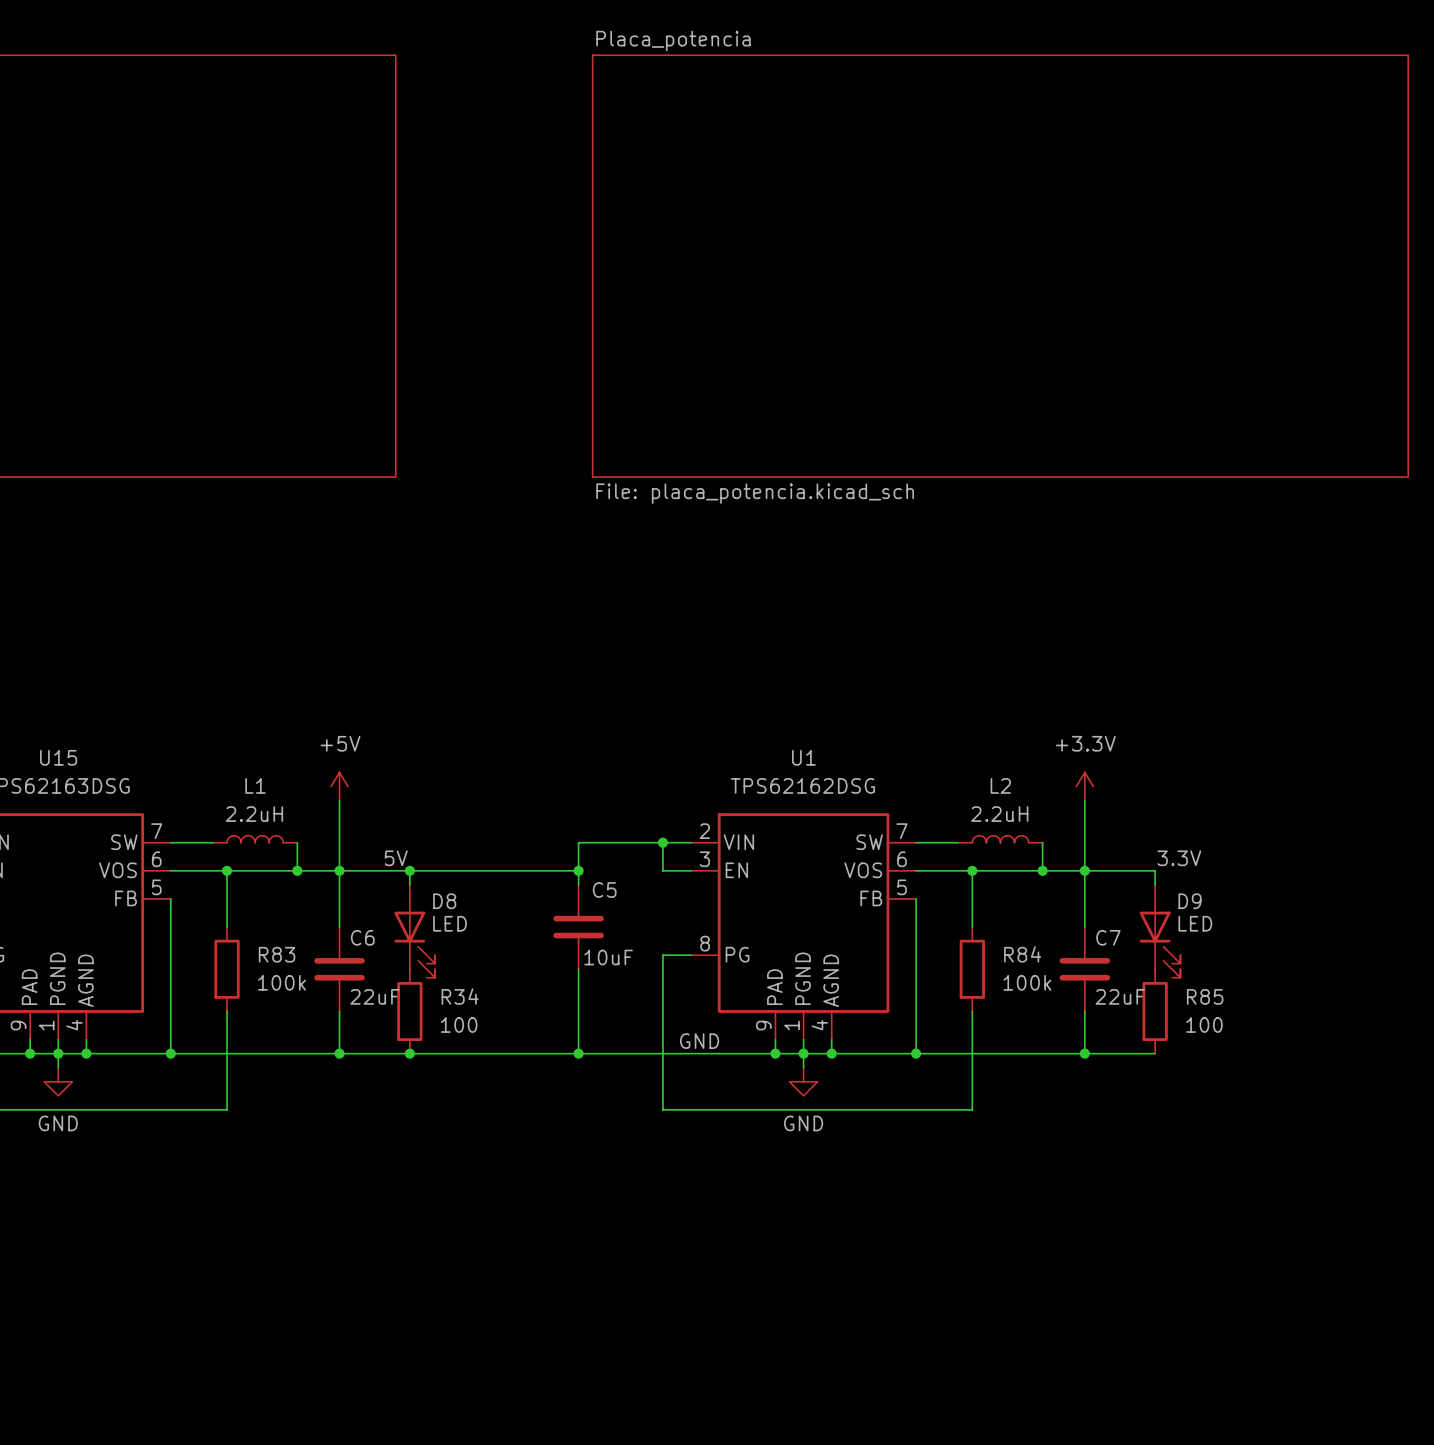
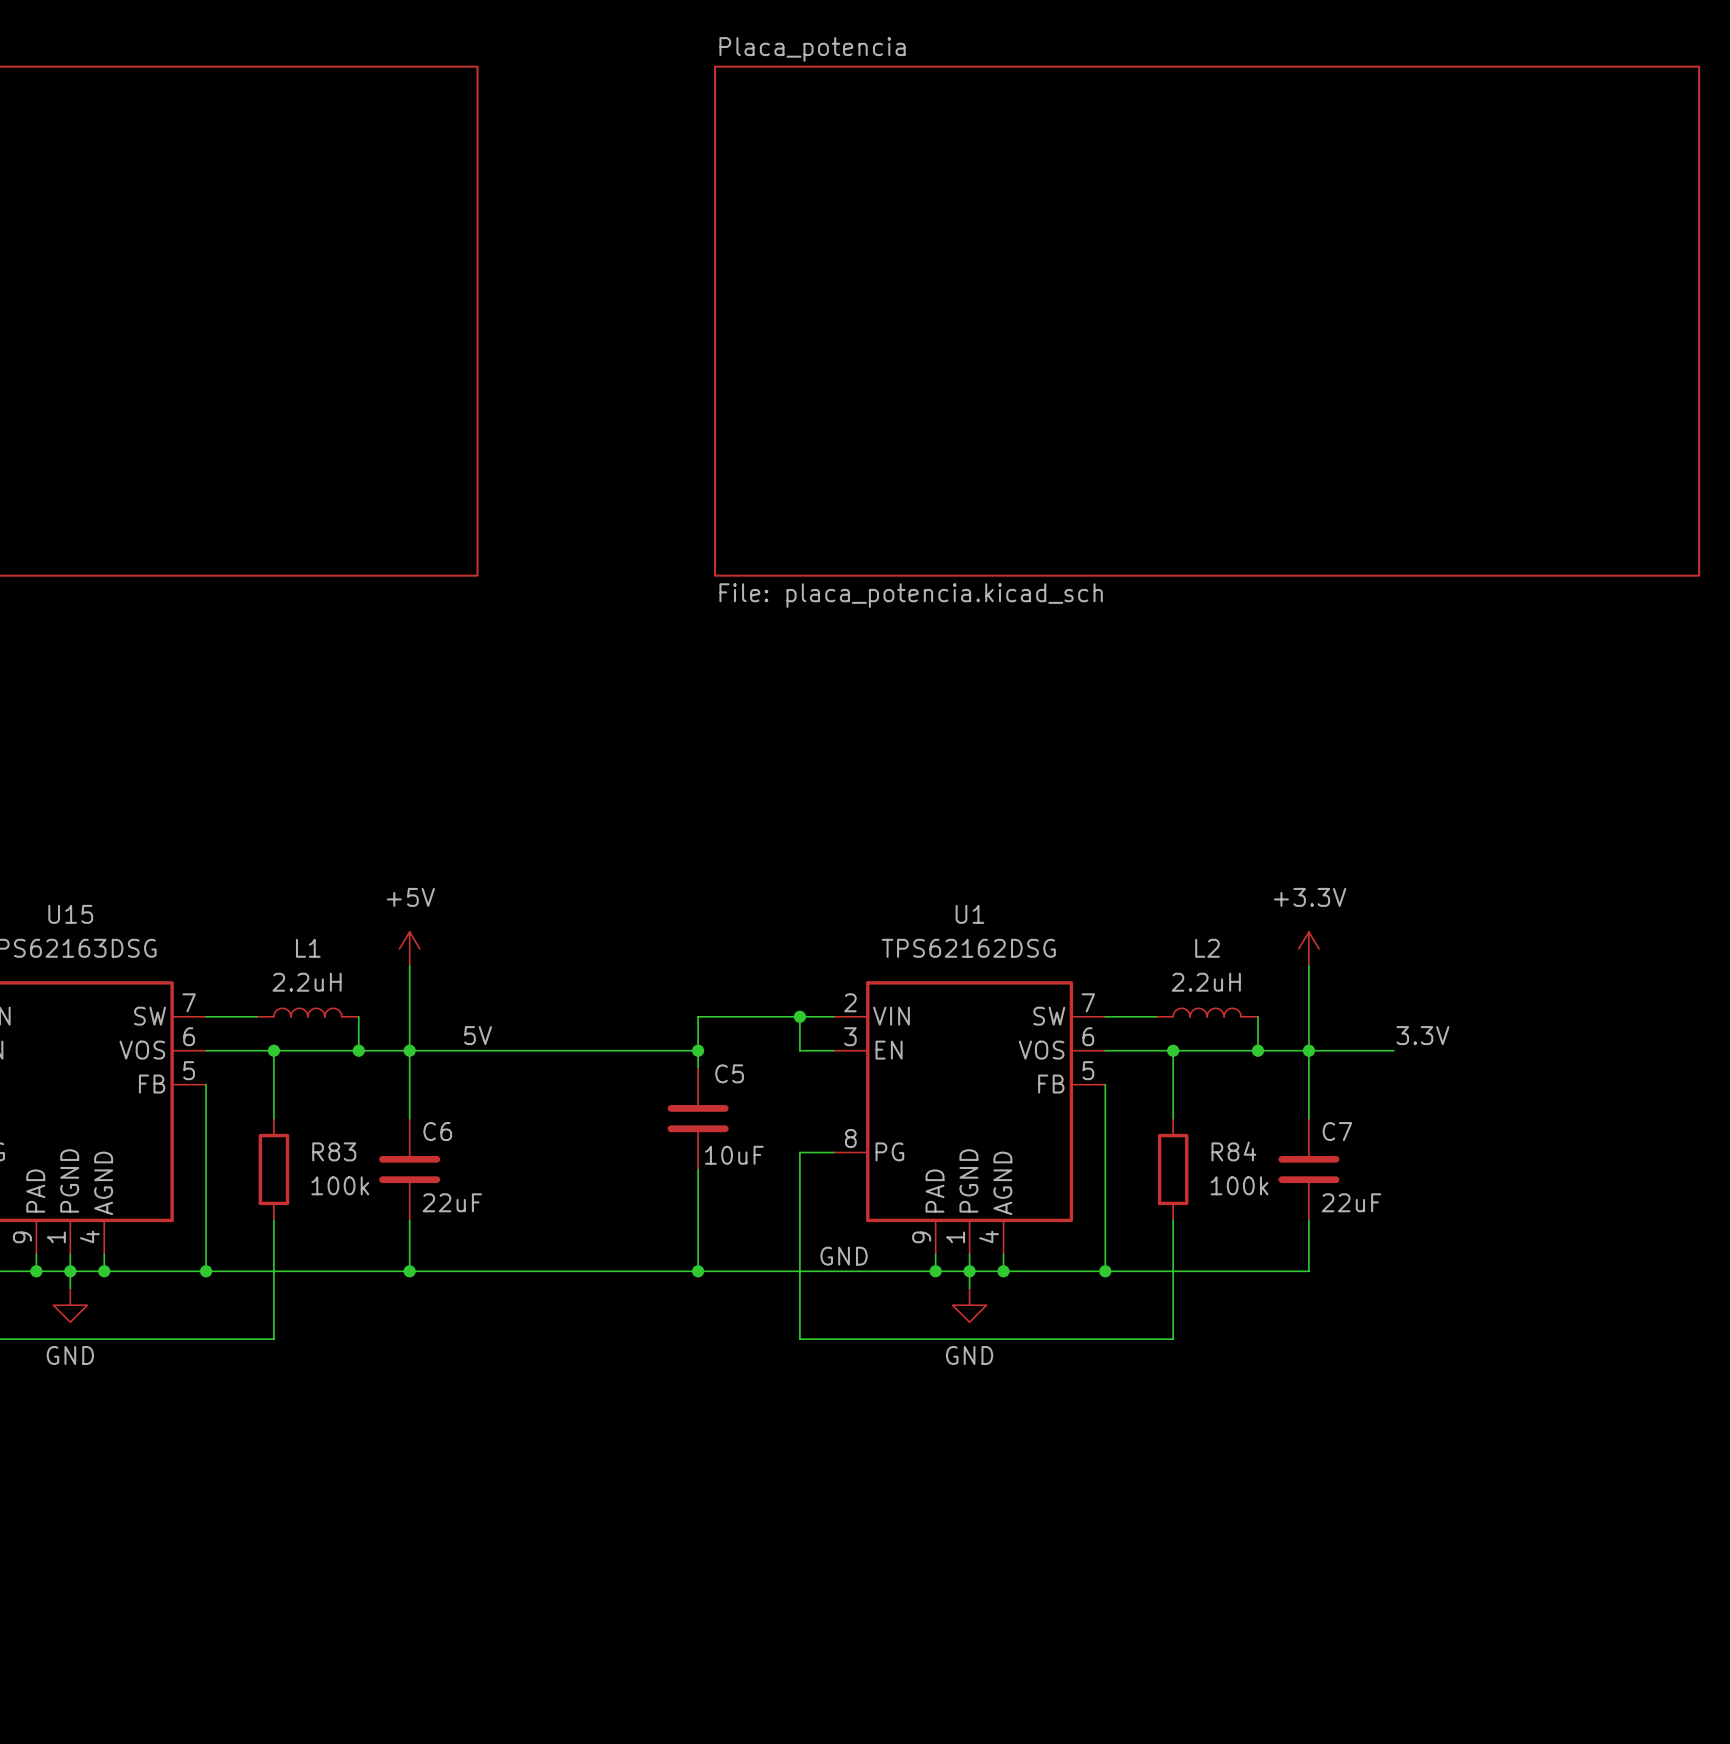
wire: (409, 870) (409, 884) -> none
junction: (409, 870) -> none
wire: (1155, 870) (1155, 884) -> none
D8: LED (414, 931) -> none
D9: LED (1160, 931) -> none
R34: 100 (409, 1011) -> none
R85: 100 (1155, 1011) -> none
junction: (409, 1053) -> none
wire: (1084, 1053) (1155, 1053) -> none
junction: (1084, 1053) -> none

